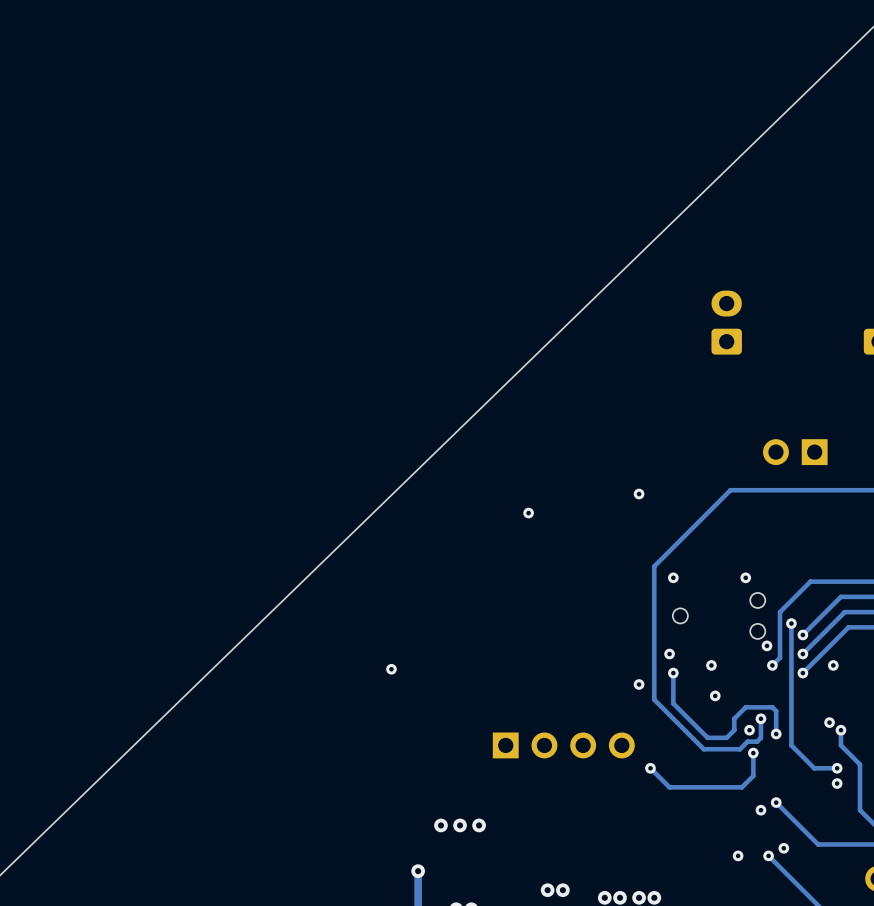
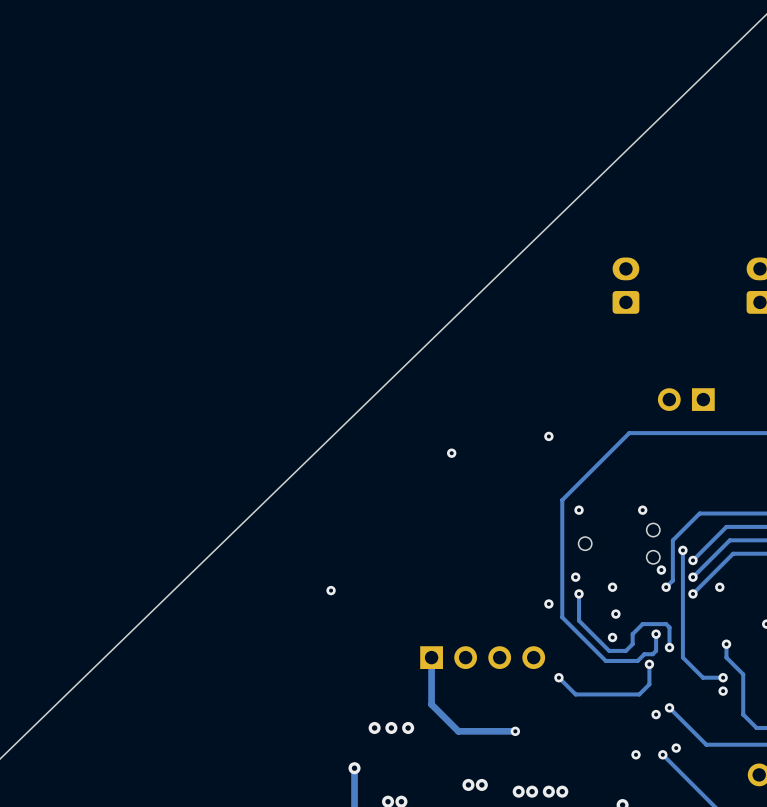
via: (829, 722) -> none
via position: (749, 730) -> (612, 637)
track: none -> (431, 657) (431, 704) (458, 731) (515, 731)
via: none -> (515, 731)

